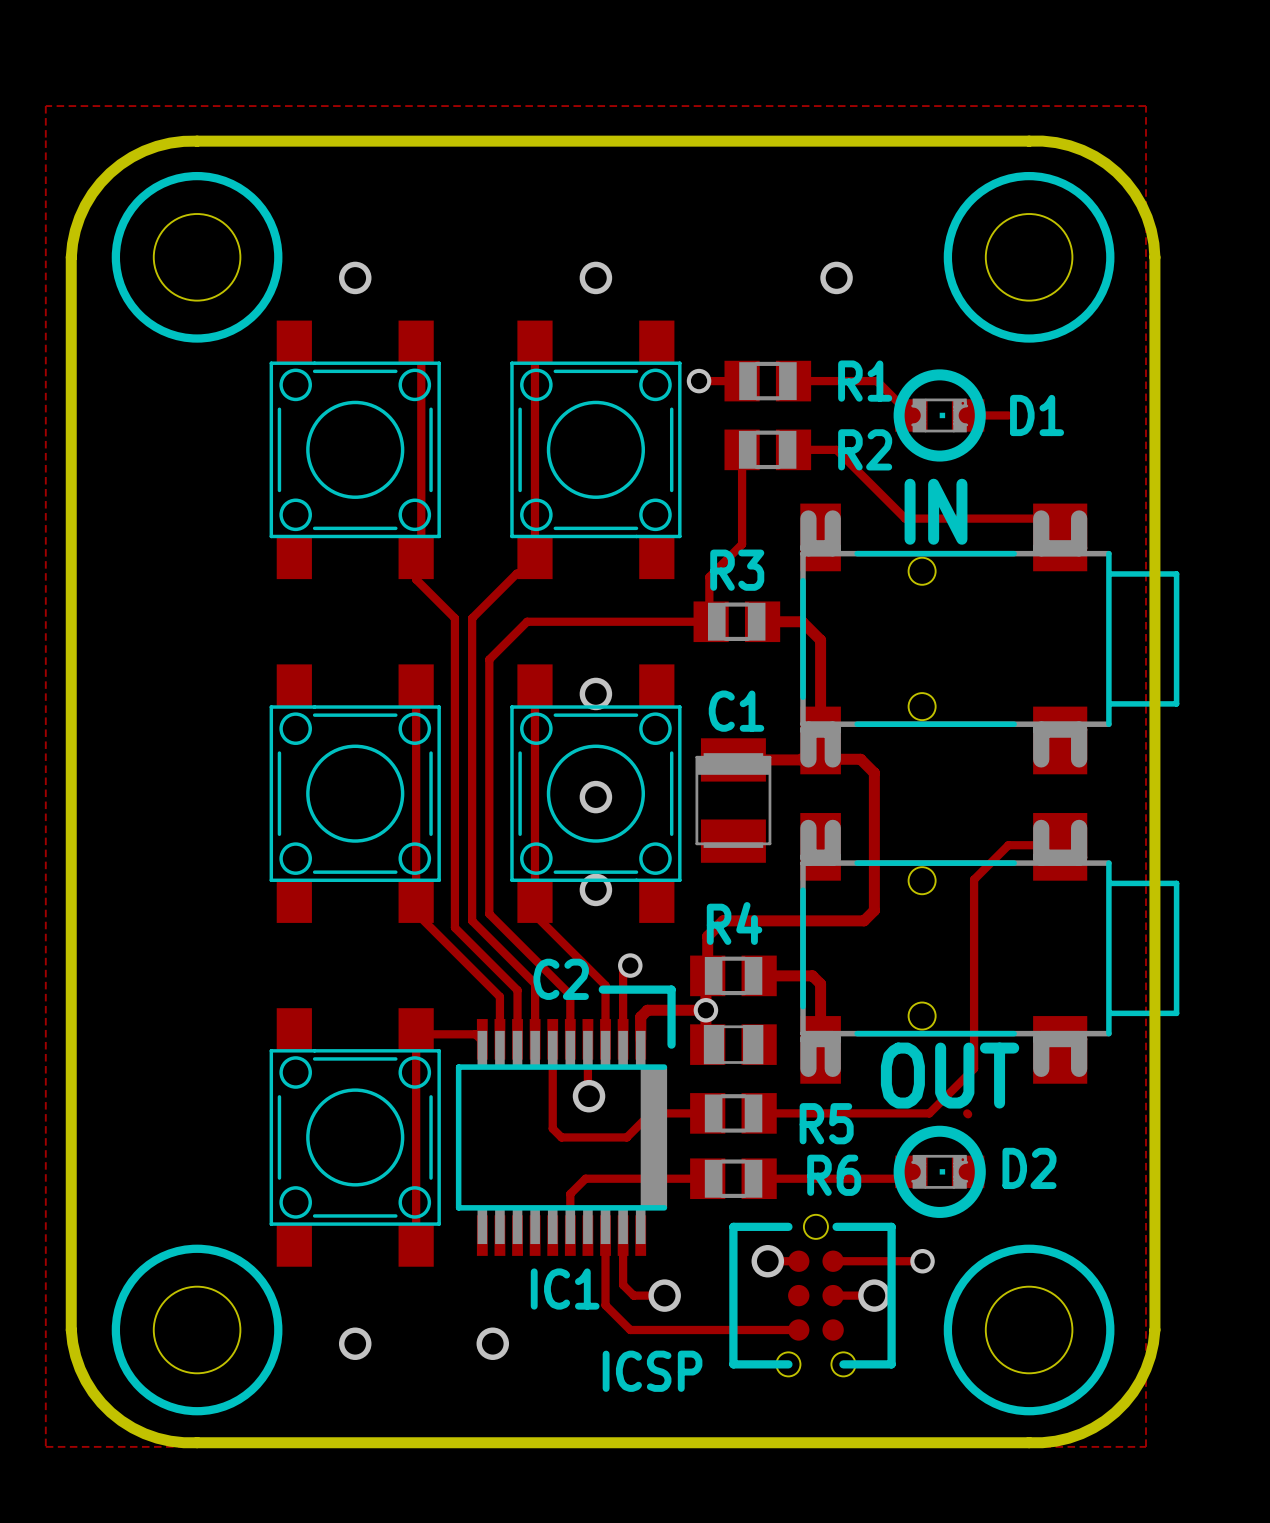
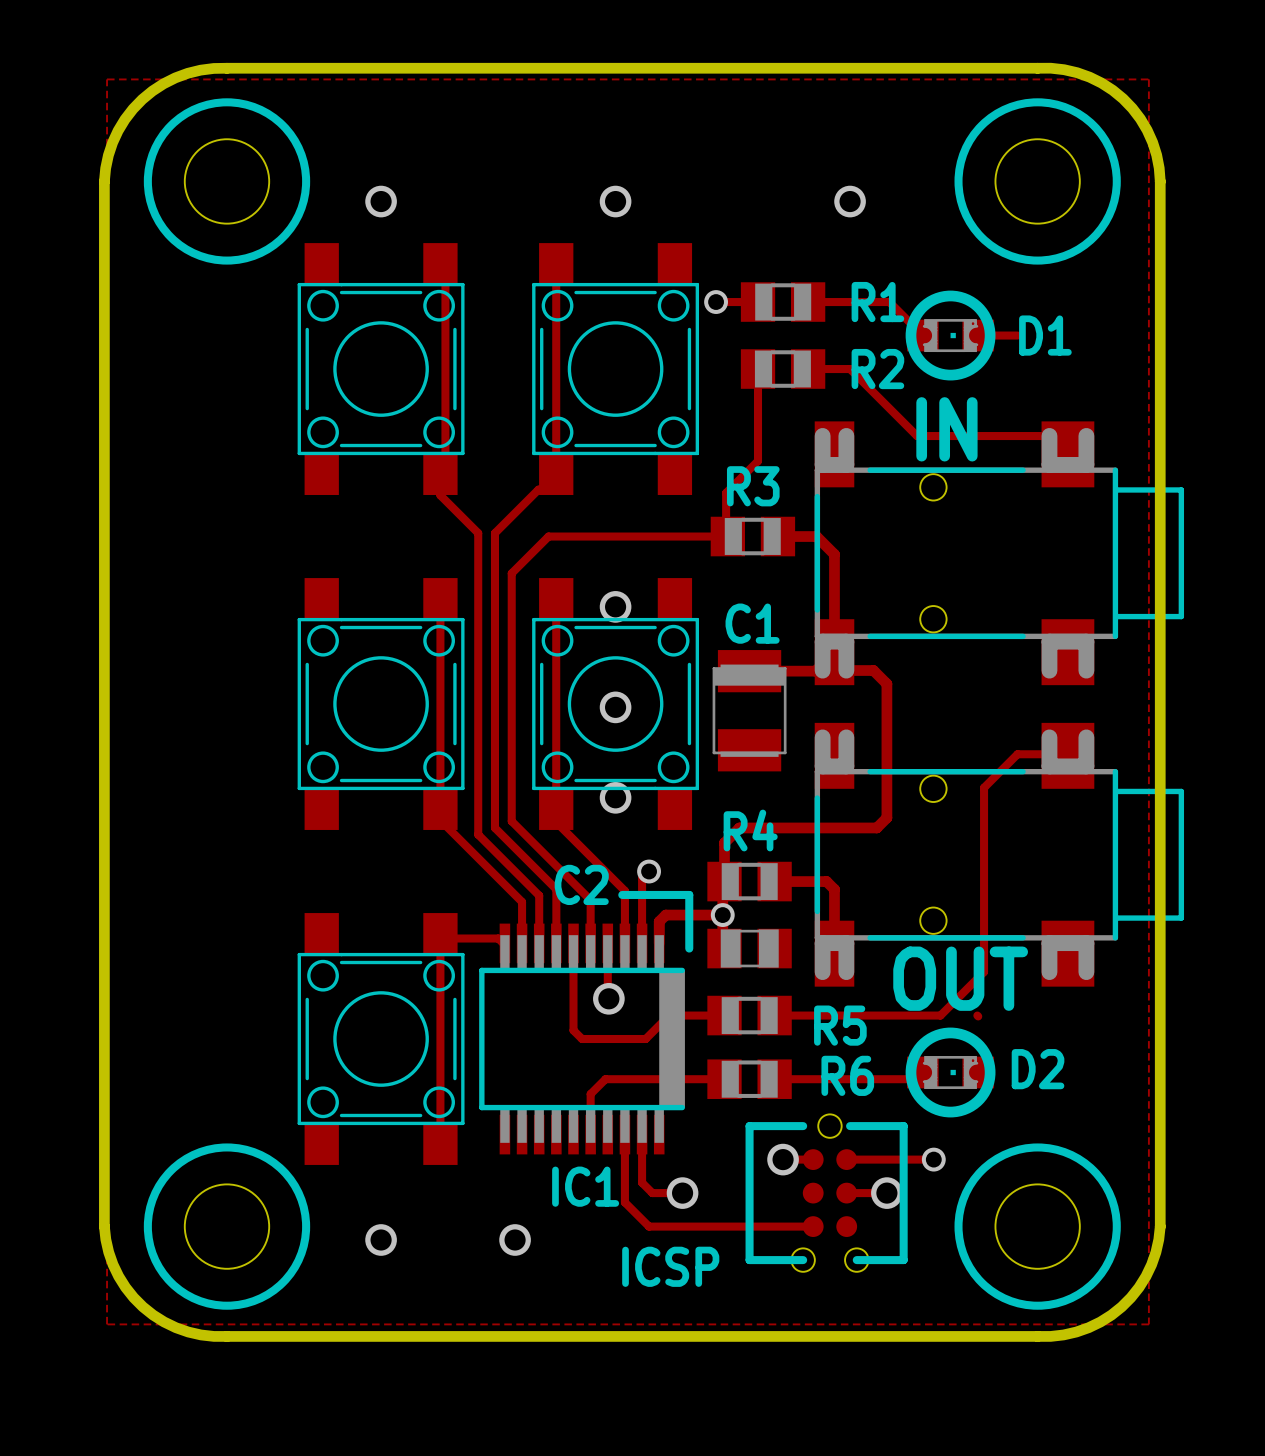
zone outline: (45, 106) (45, 1446) (1145, 1446) (1145, 106) (45, 106) -> (107, 79) (107, 1324) (1148, 1324) (1148, 79) (107, 79)

